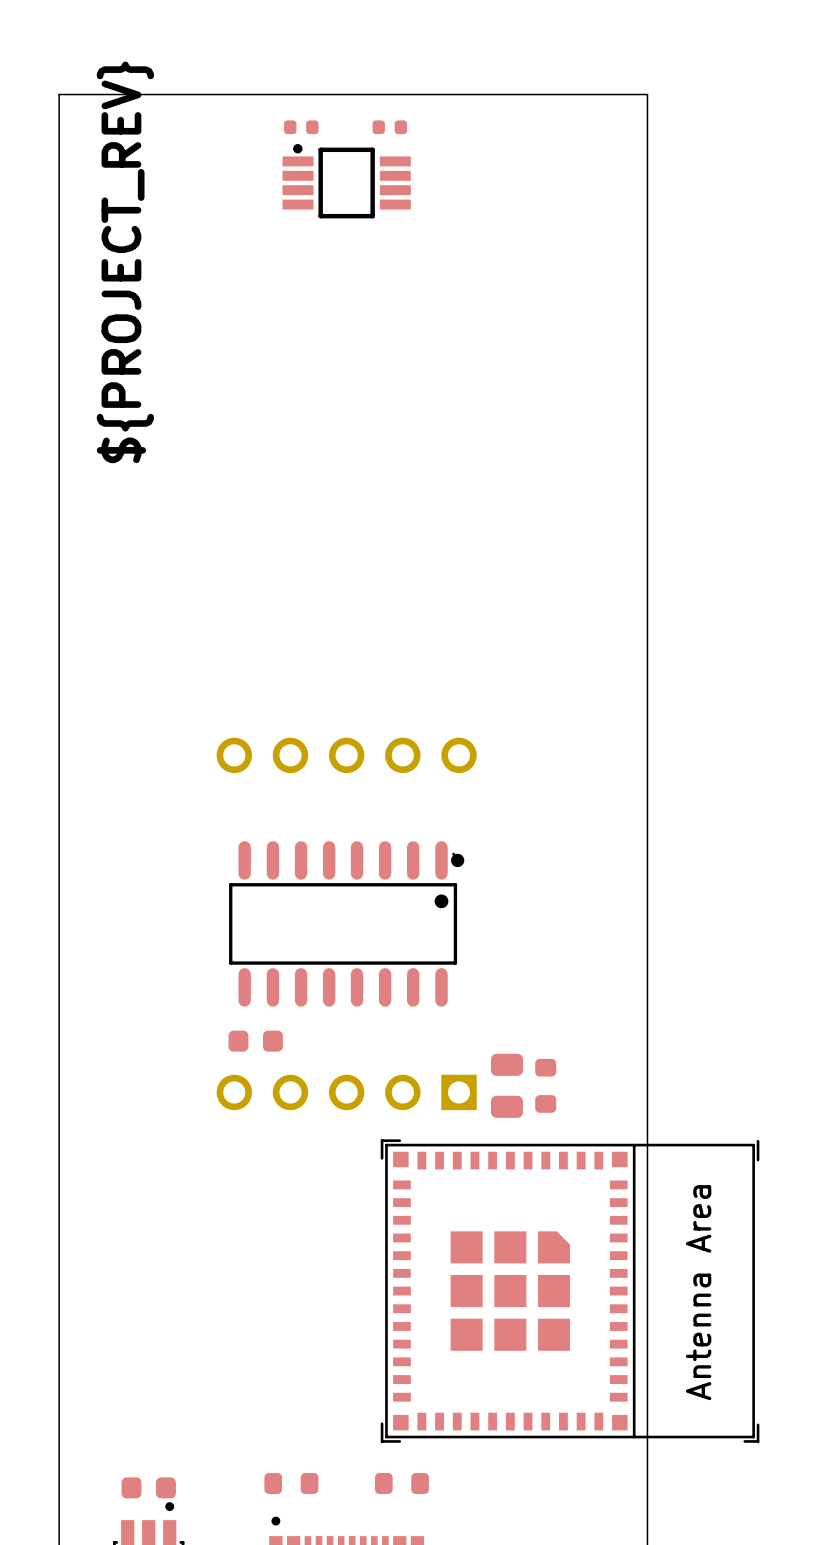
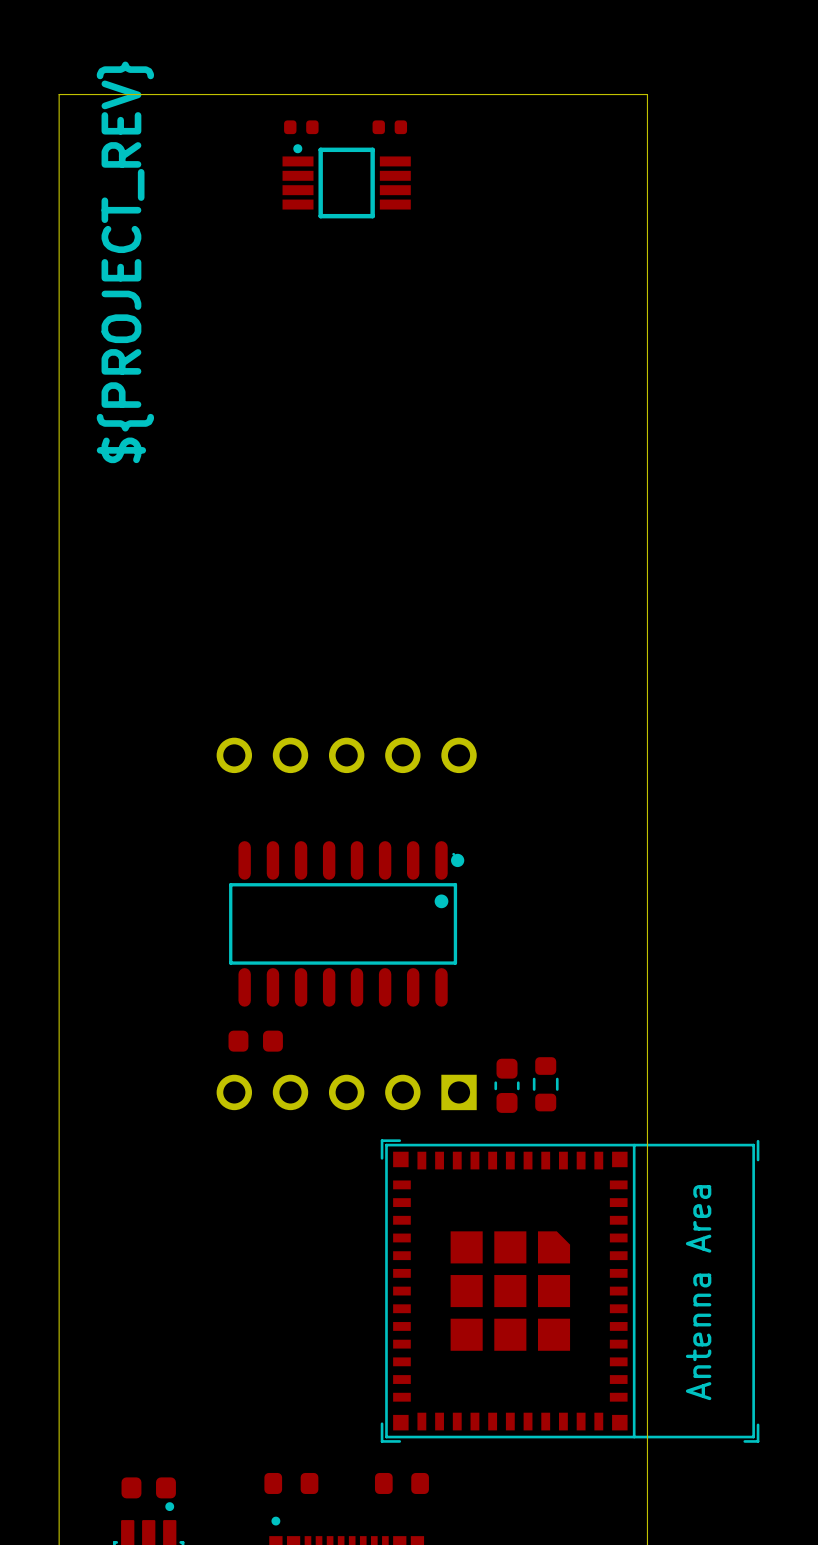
part footprint: [490, 1053, 524, 1118] -> [494, 1058, 520, 1113]
part footprint: [535, 1058, 557, 1113] -> [532, 1057, 559, 1112]

